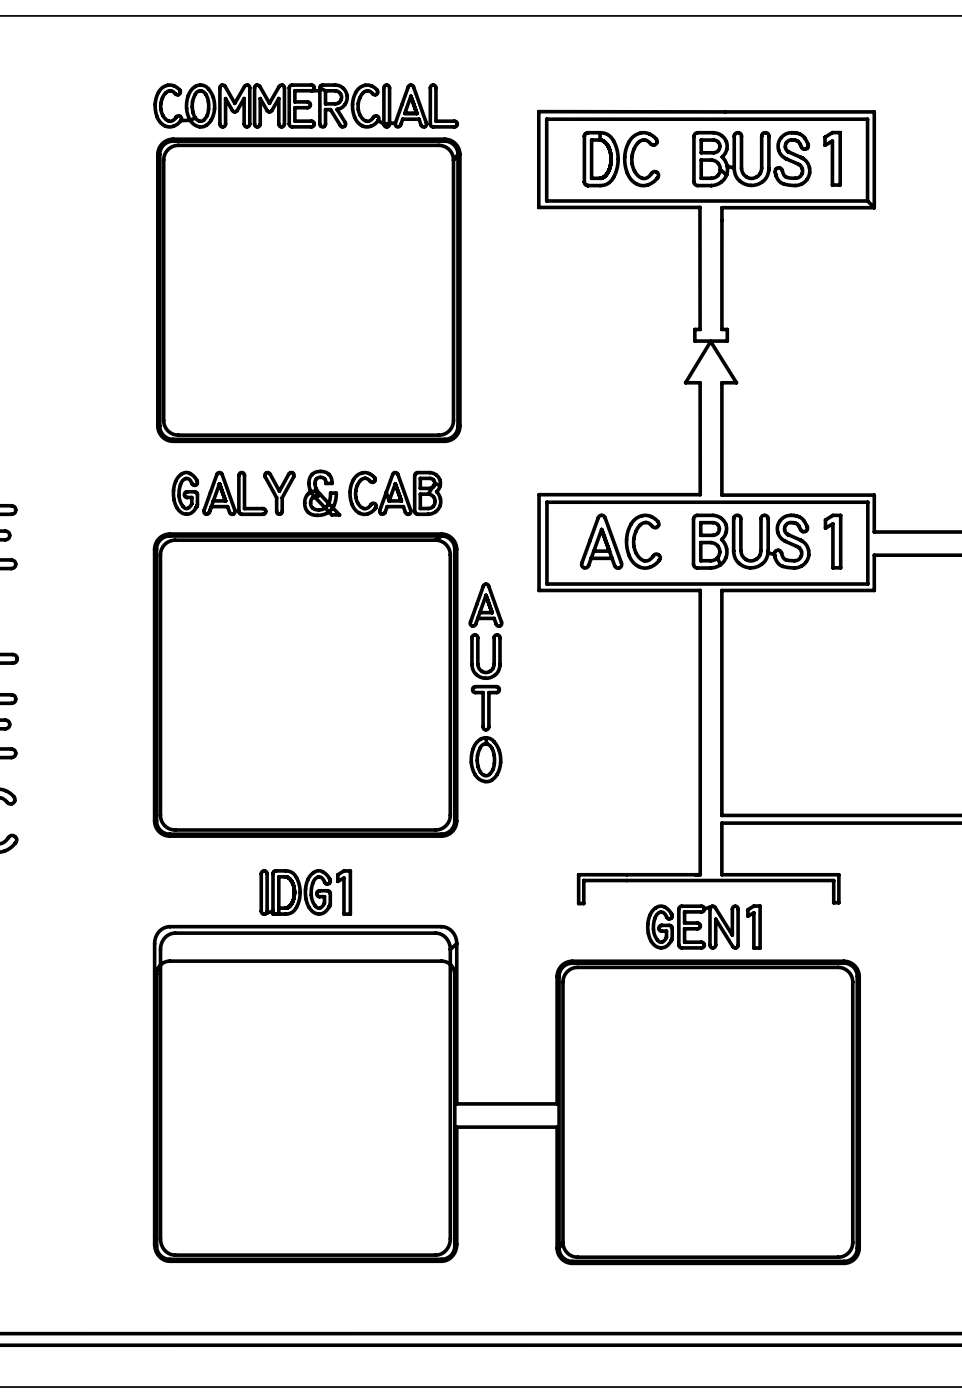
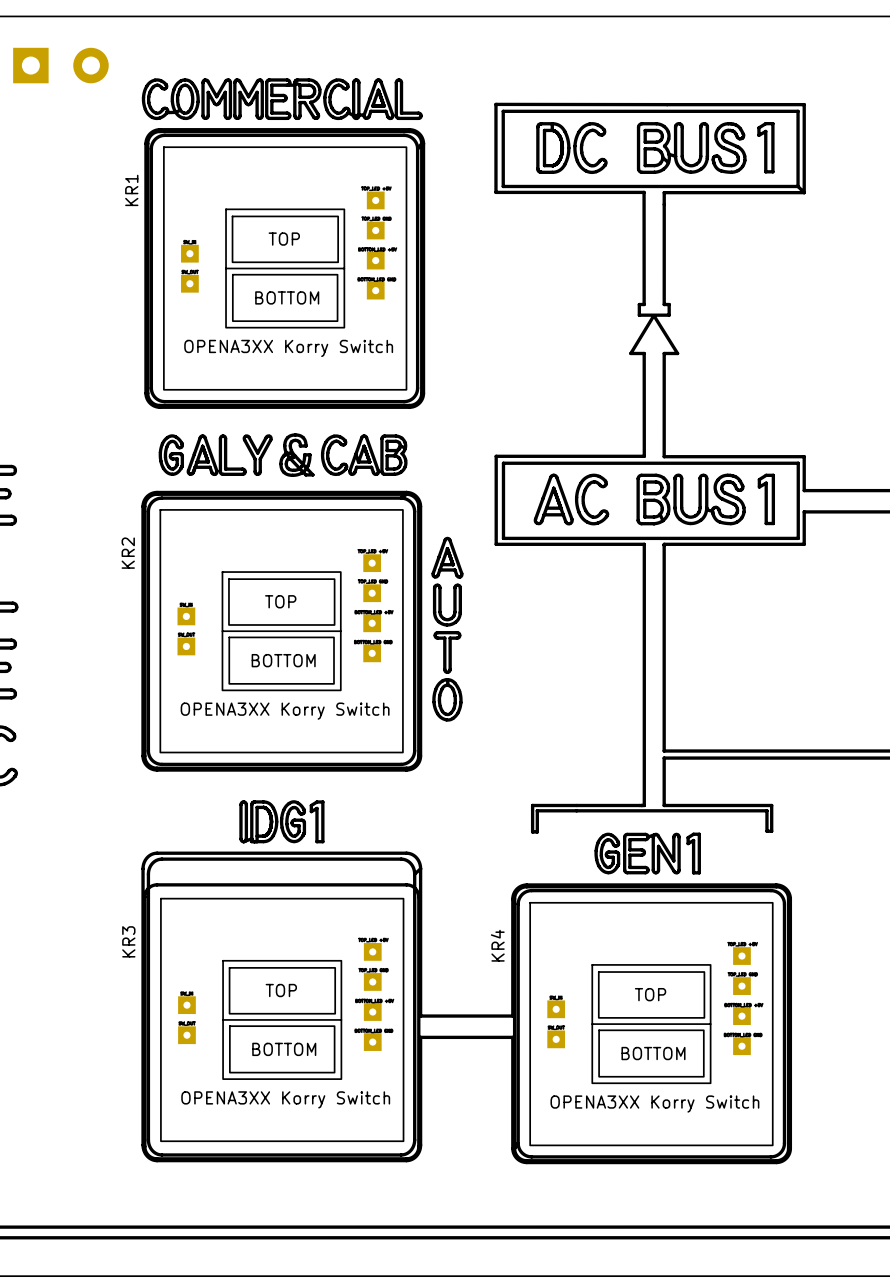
part: none -> (60, 65)
KR1: none -> (285, 268)
KR2: none -> (281, 631)
KR3: none -> (282, 1019)
KR4: none -> (651, 1024)

